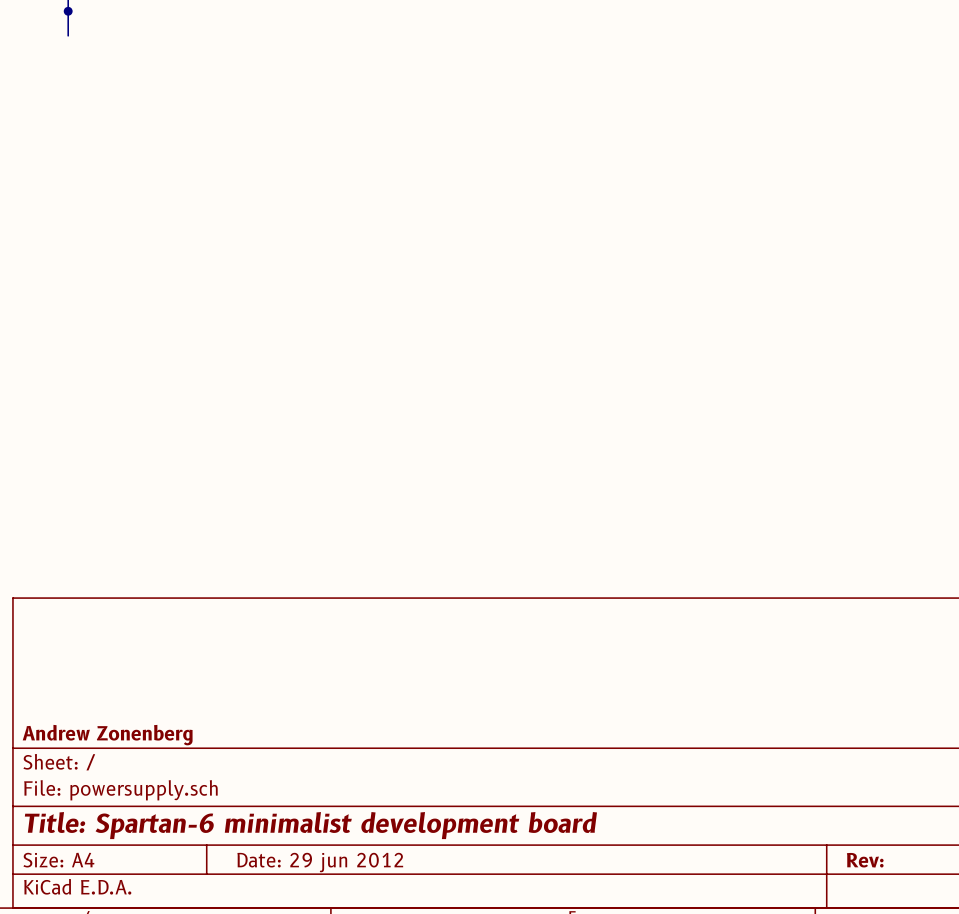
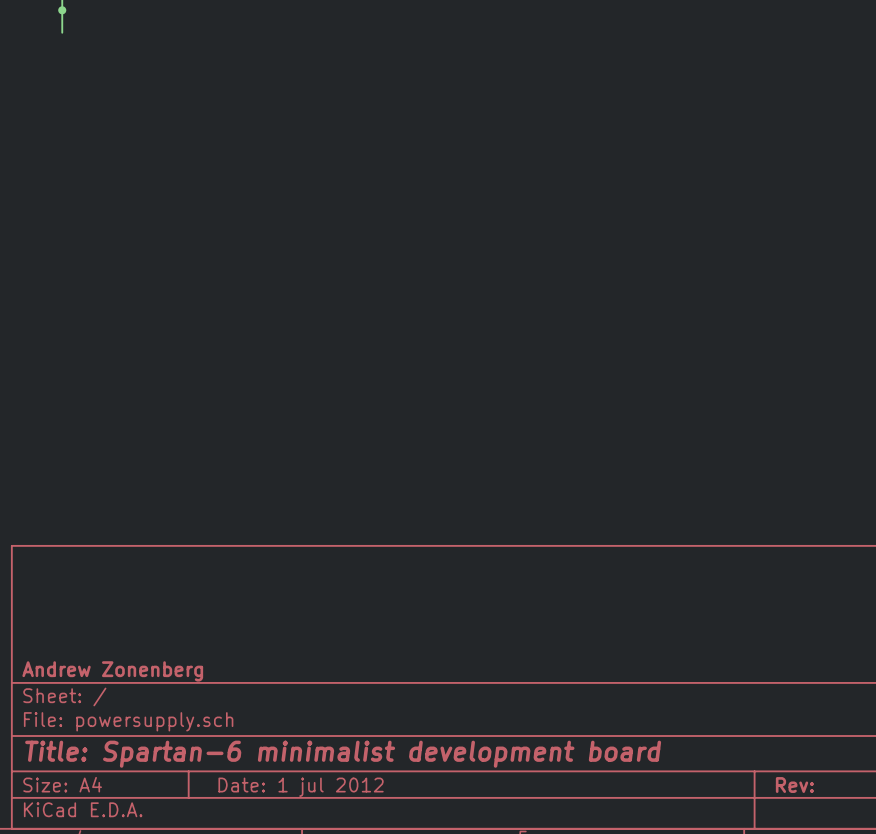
title block: Date: 29 jun 2012 (320, 862) -> Date: 1 jul 2012 (301, 787)

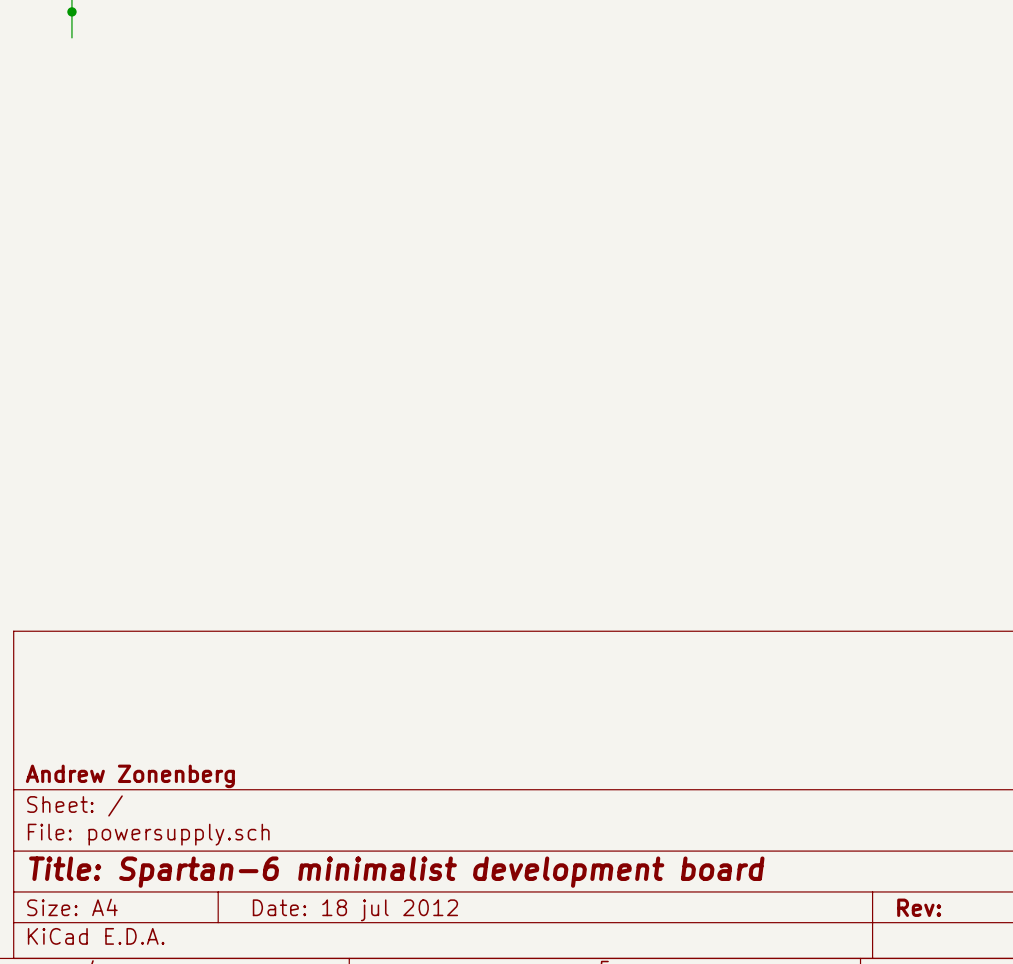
title block: Date: 1 jul 2012 (301, 787) -> Date: 18 jul 2012 (355, 910)

